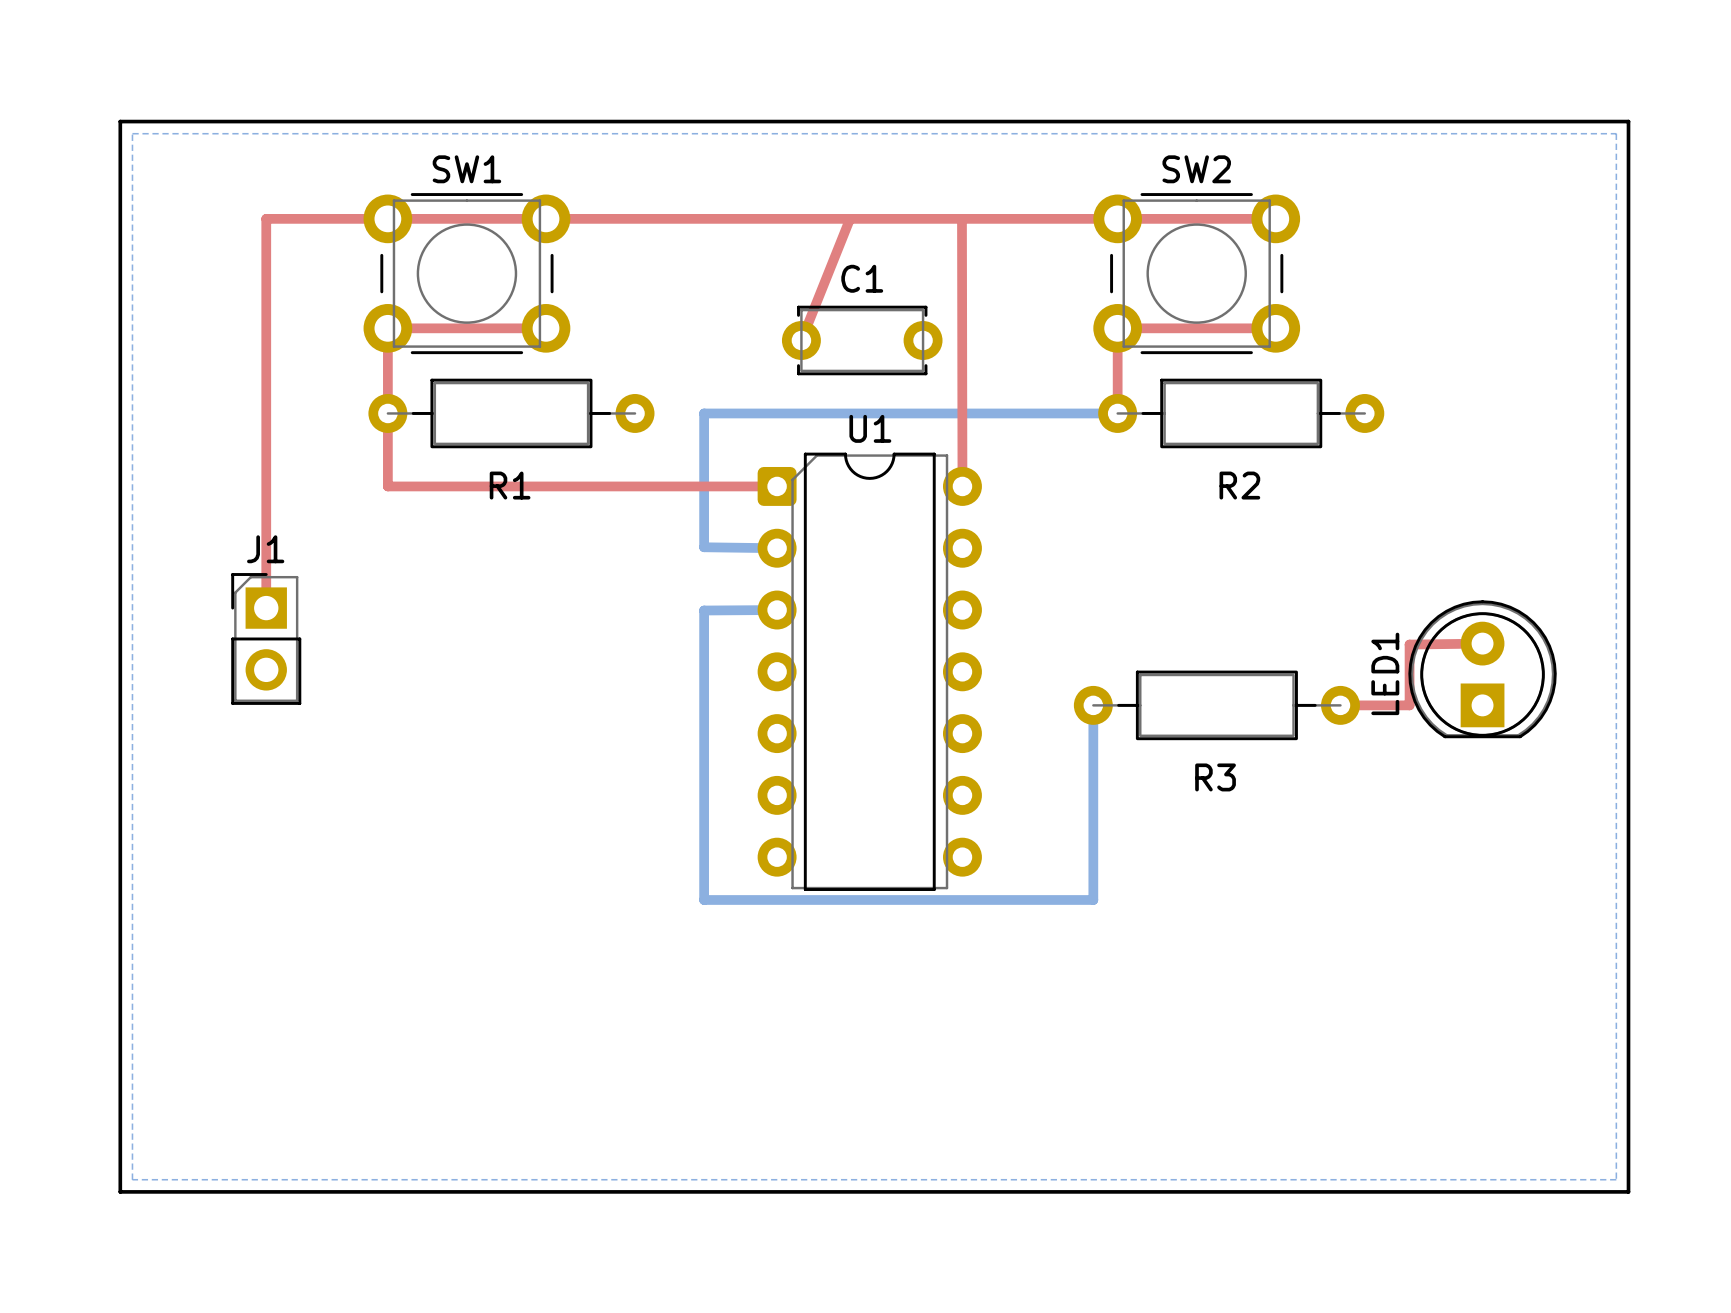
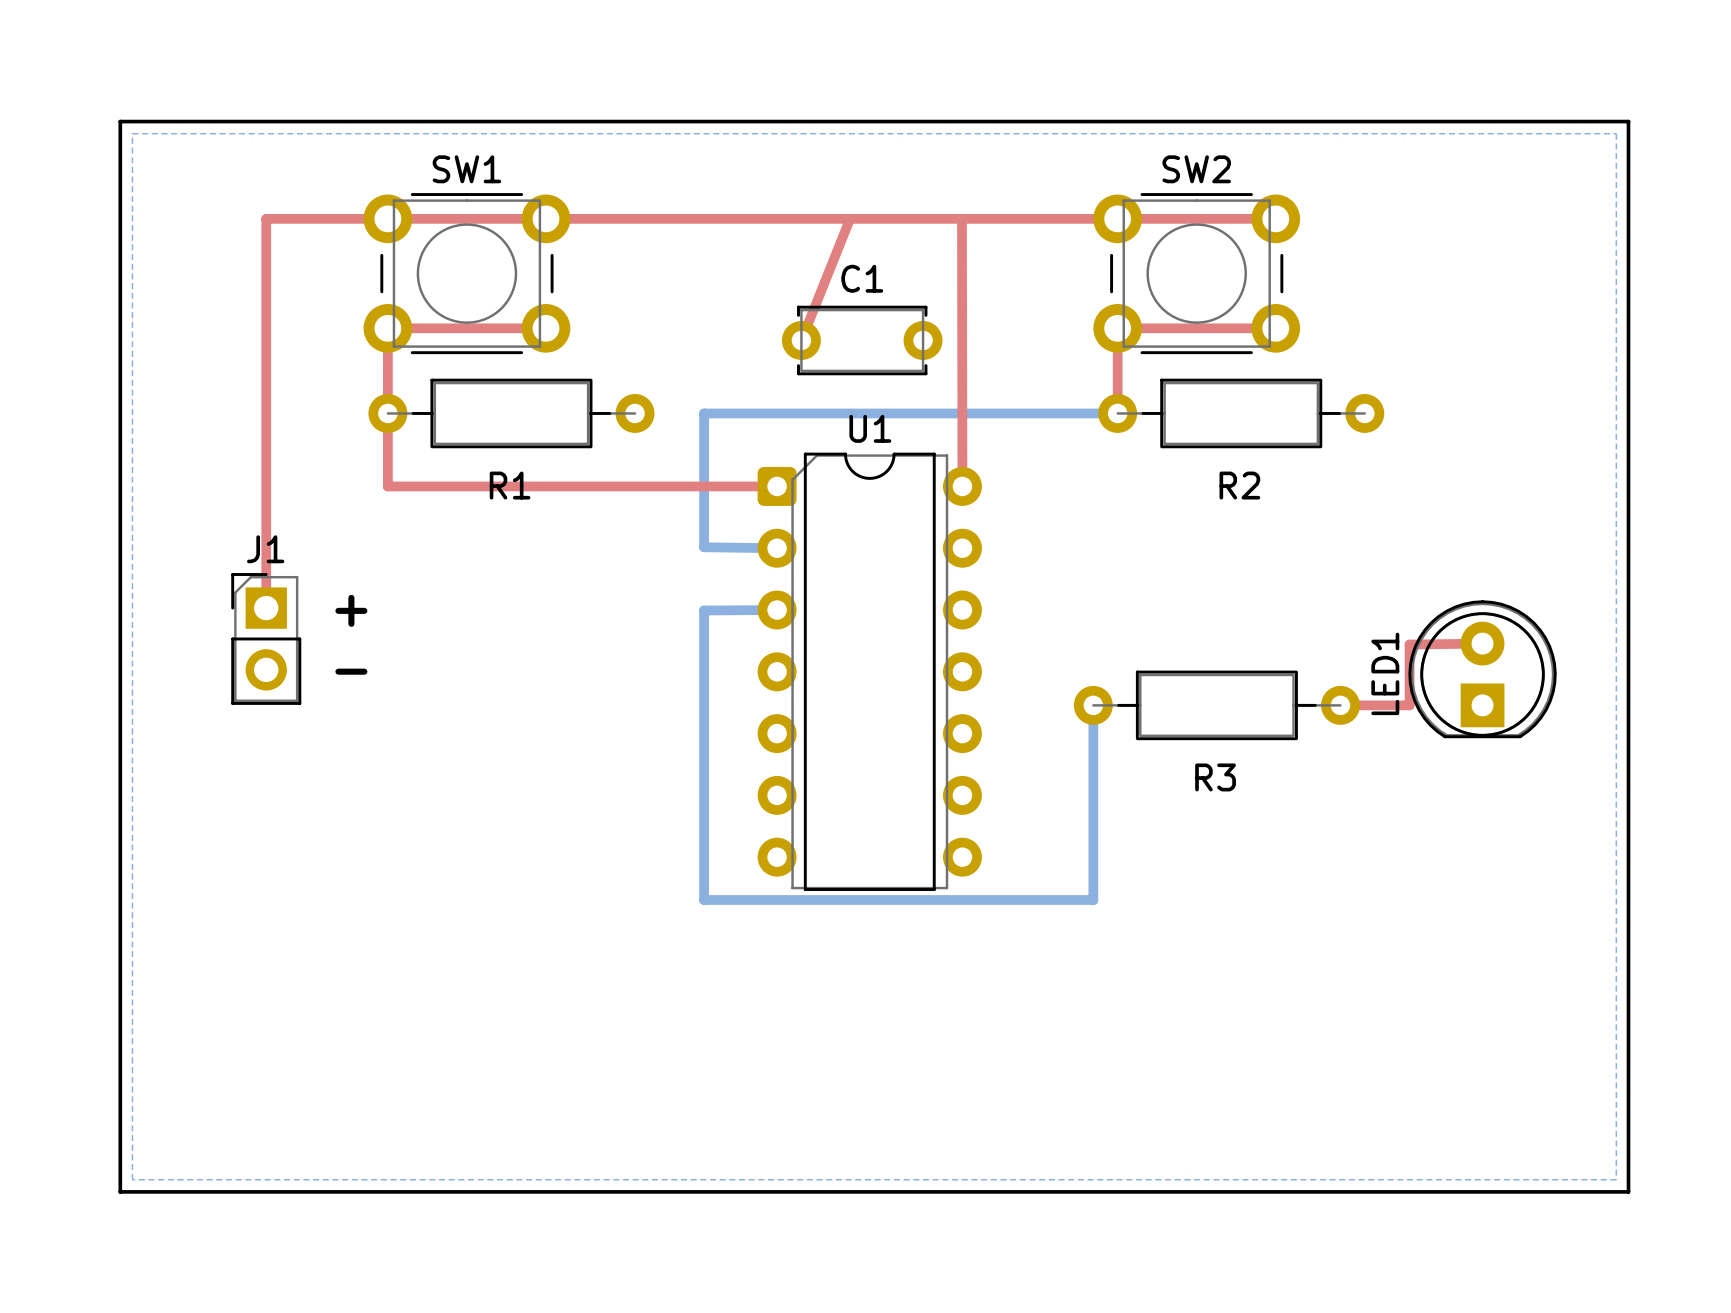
text: none -> + (351, 610)
text: none -> - (351, 671)

